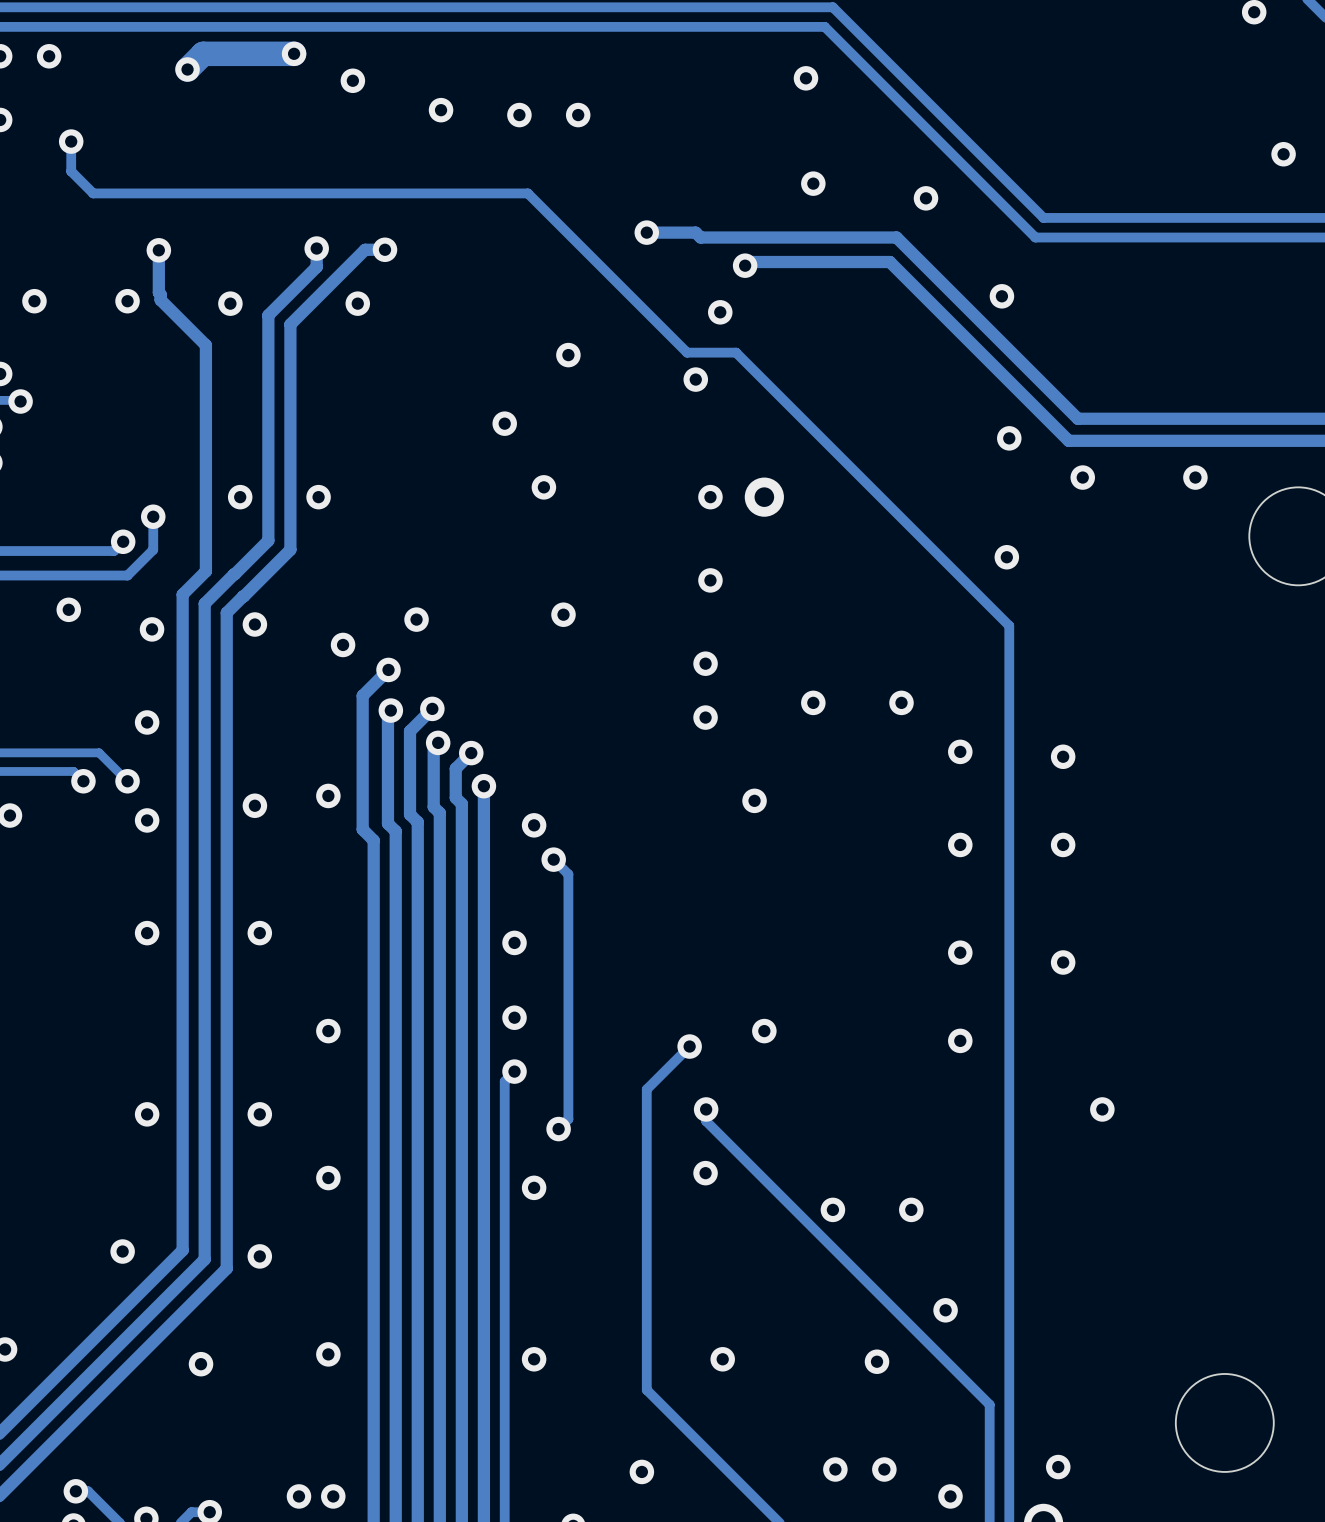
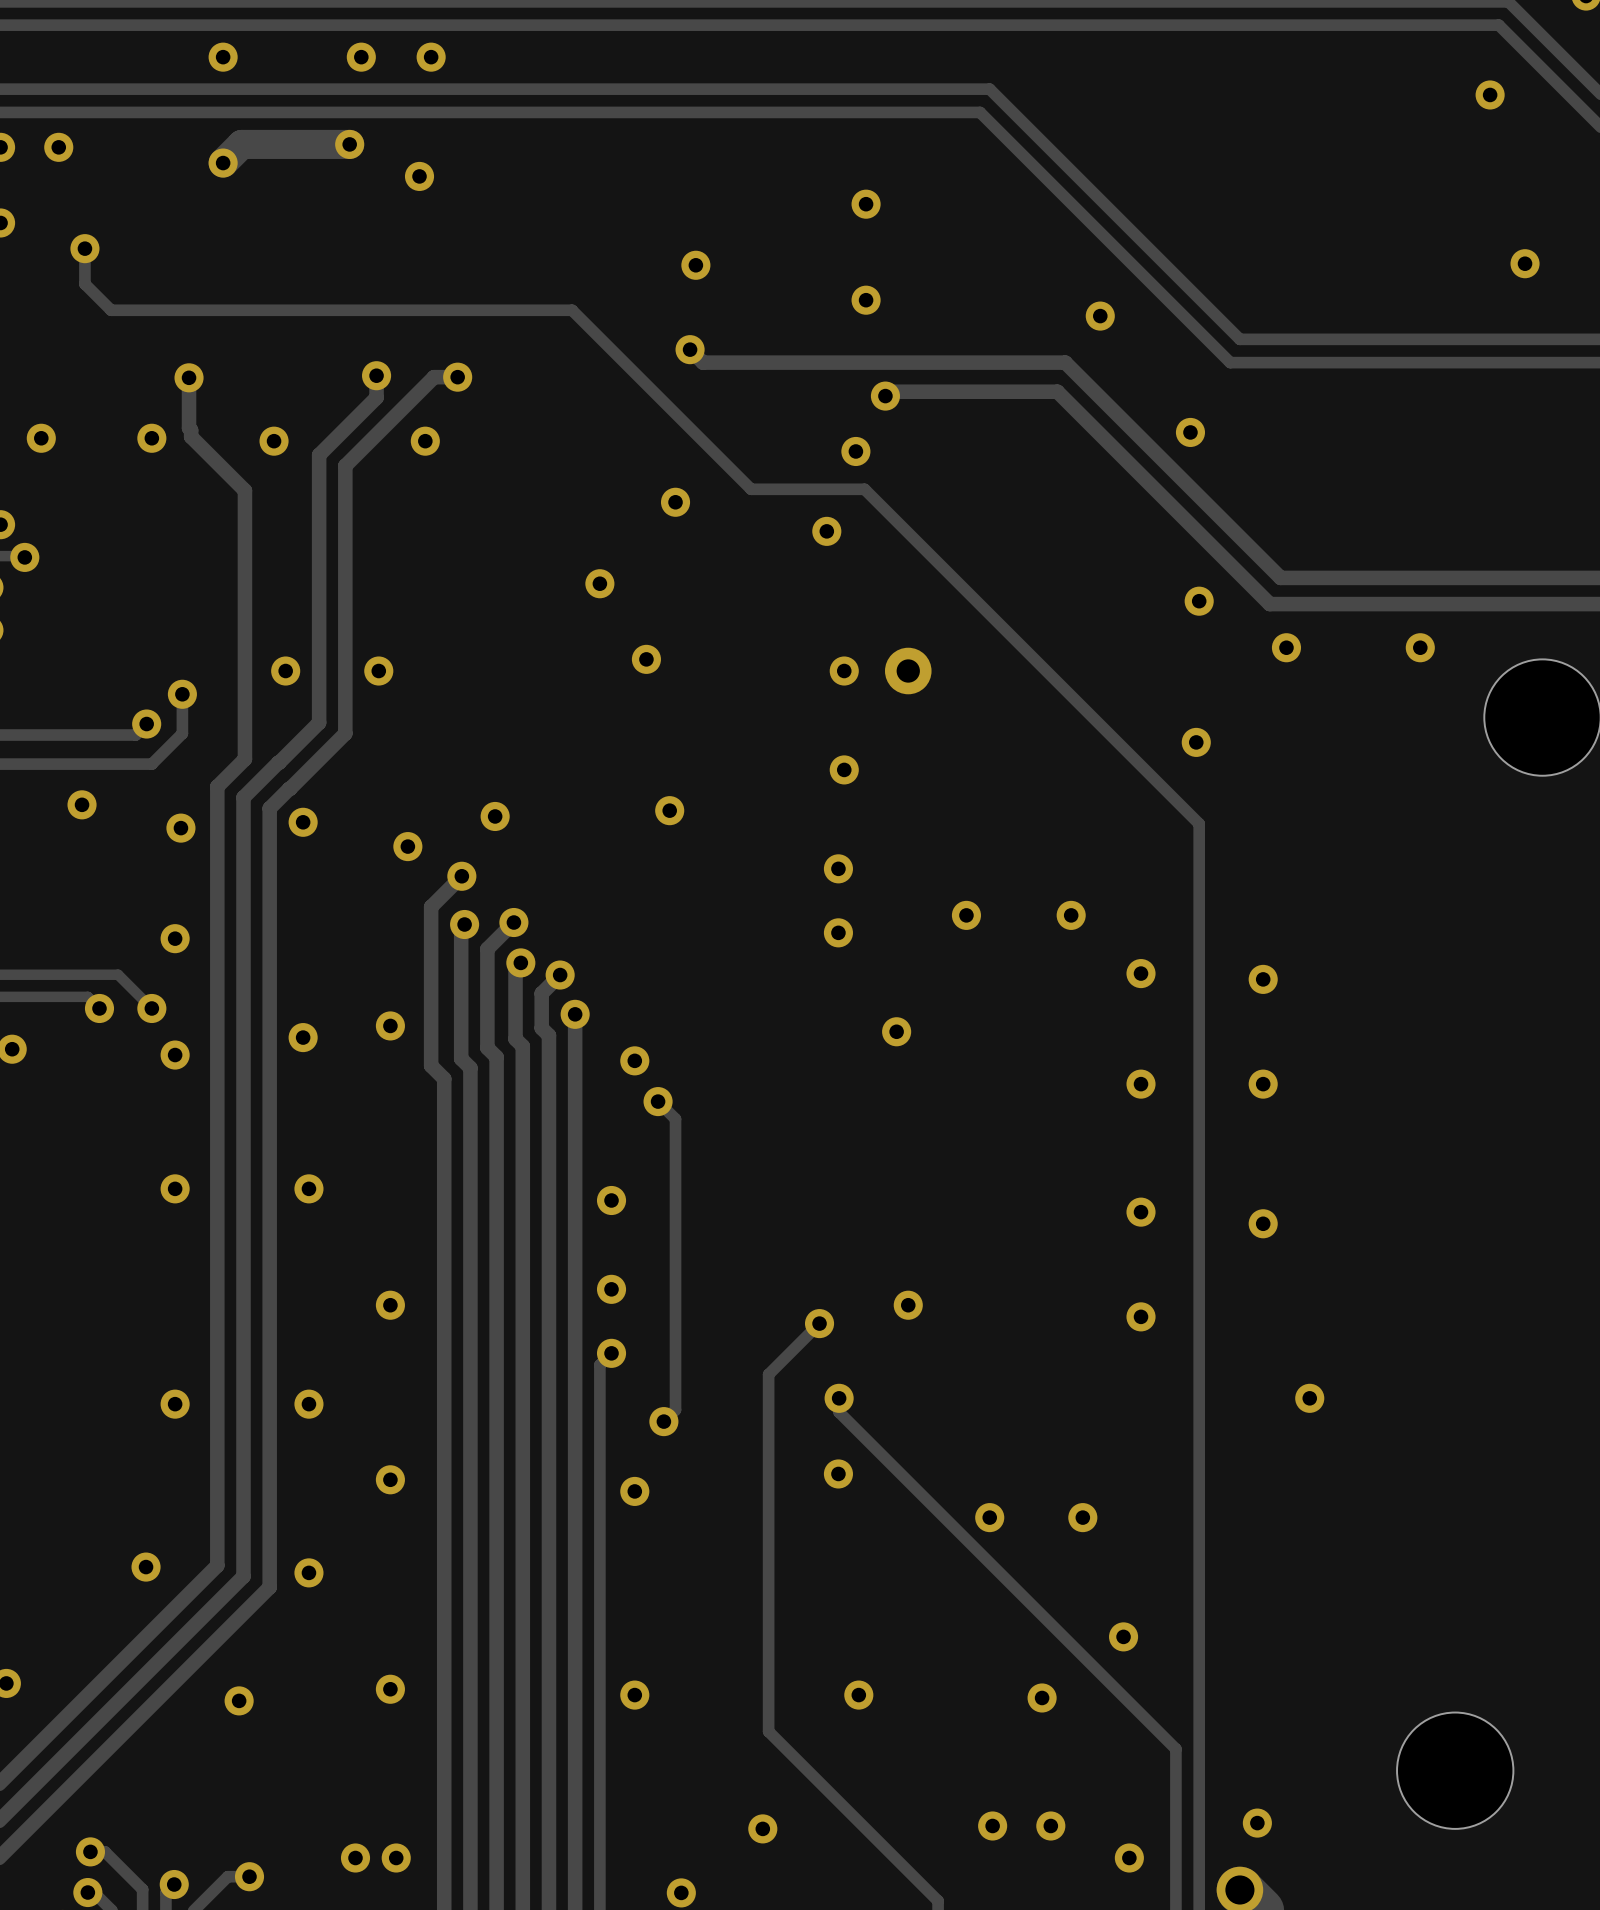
via: (805, 78) -> none
via: none -> (866, 204)
via: (441, 110) -> none
via: (519, 115) -> none
via: (578, 115) -> none
via: none -> (695, 265)
via: (813, 183) -> none
via: none -> (866, 300)
track: (481, 193) (527, 193) (687, 352) (736, 352) -> (572, 310) (751, 489) (864, 489) (874, 499)
via: none -> (690, 349)
track: (646, 232) (695, 232) (700, 237) -> (690, 349) (703, 362) (832, 362)
via: (646, 232) -> none

